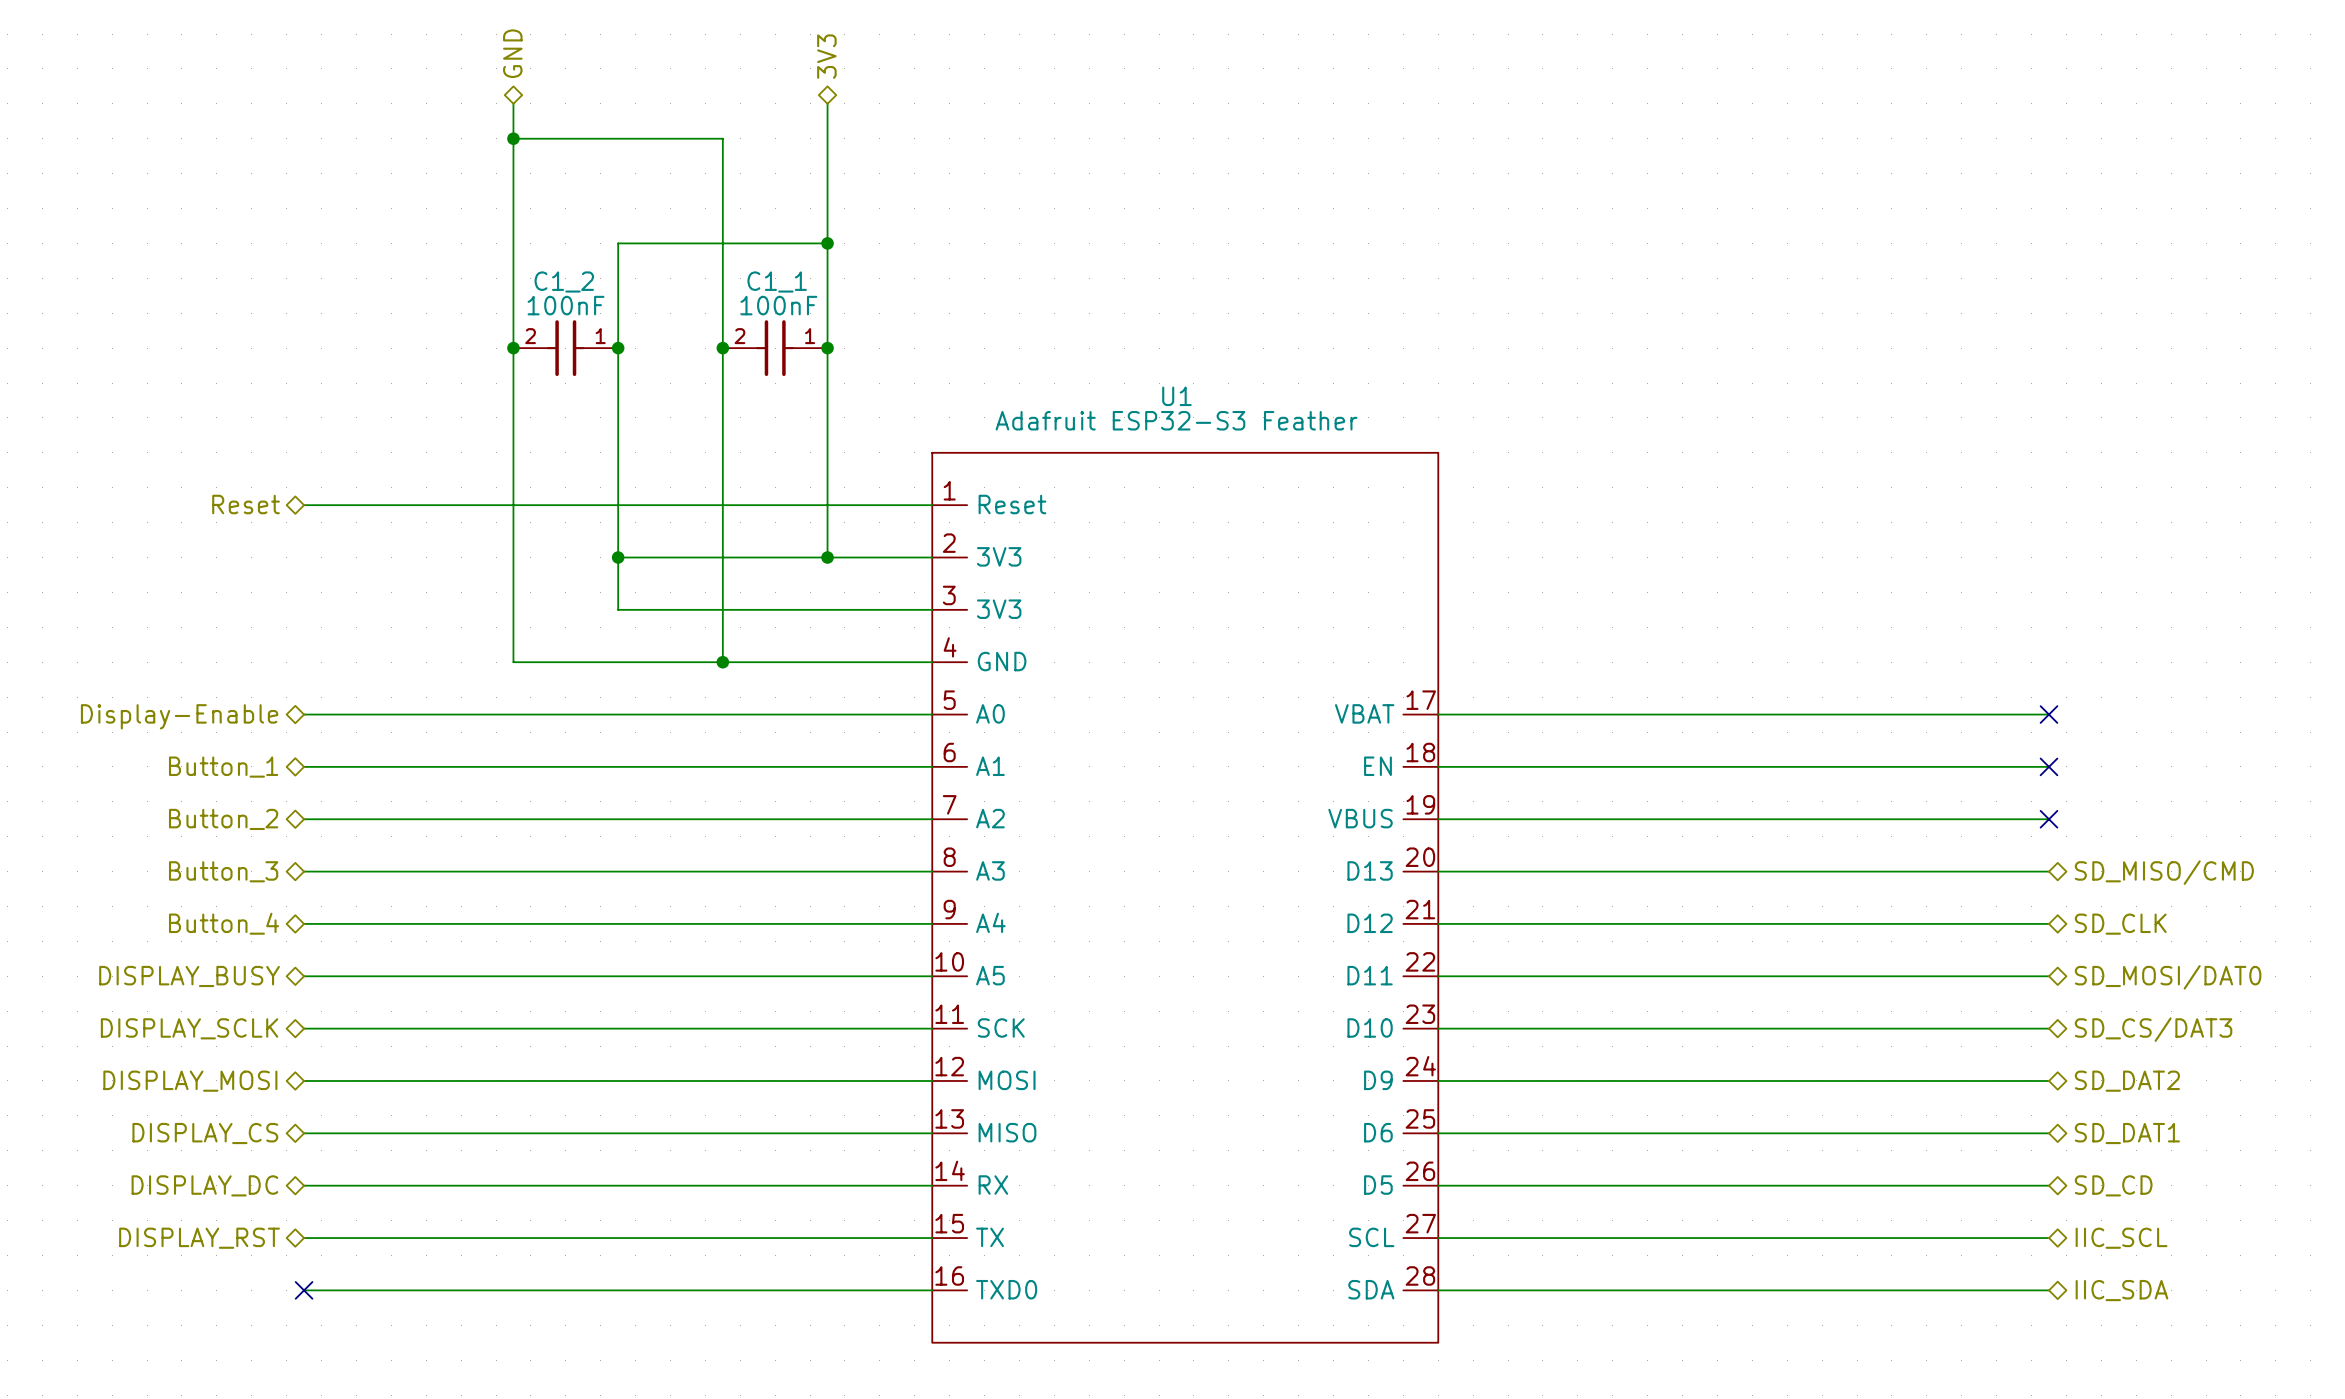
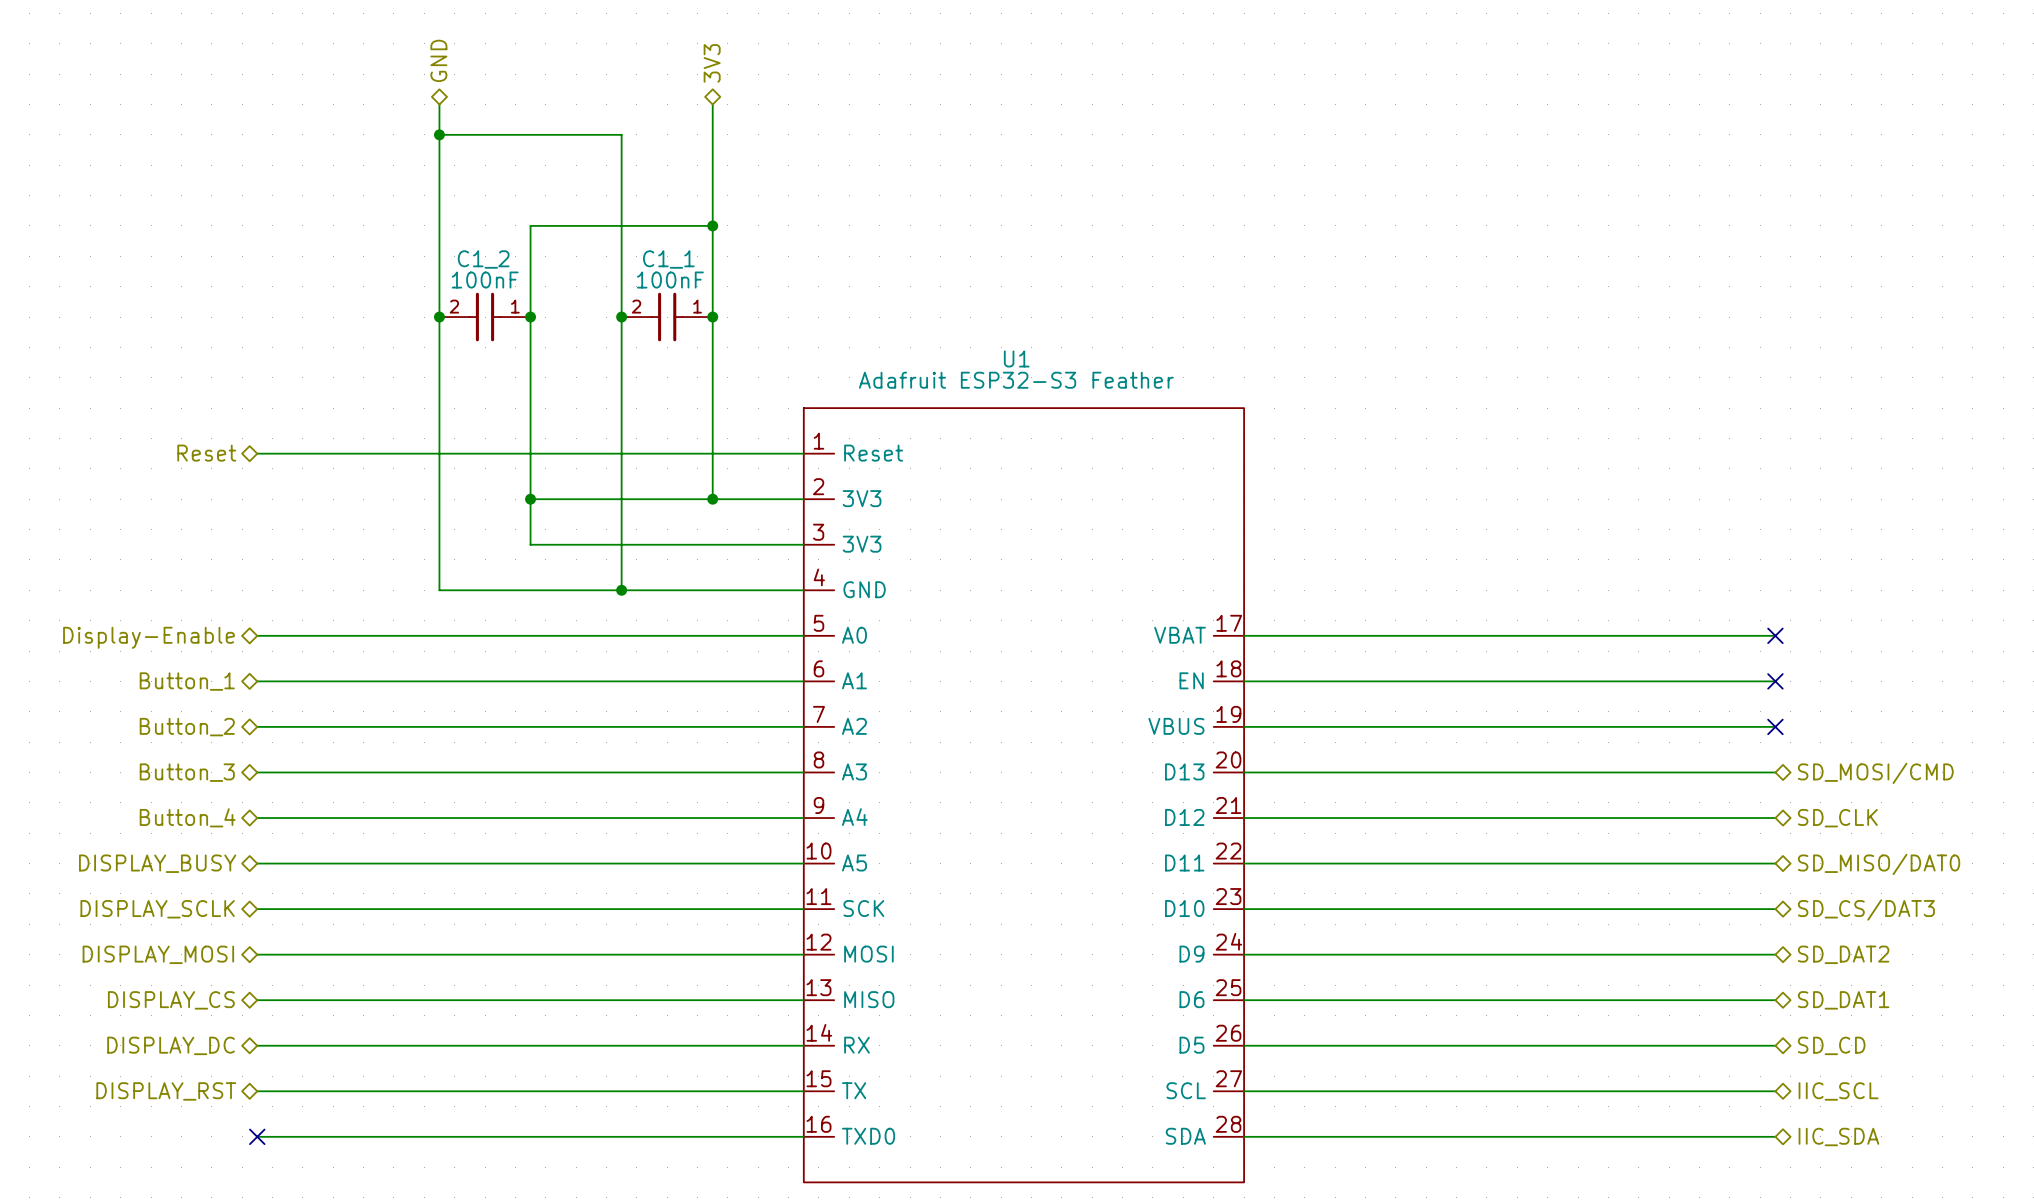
hierarchical label: SD_MISO/CMD (2164, 872) -> SD_MOSI/CMD (1875, 773)
hierarchical label: SD_MOSI/DAT0 (2168, 977) -> SD_MISO/DAT0 (1879, 864)

